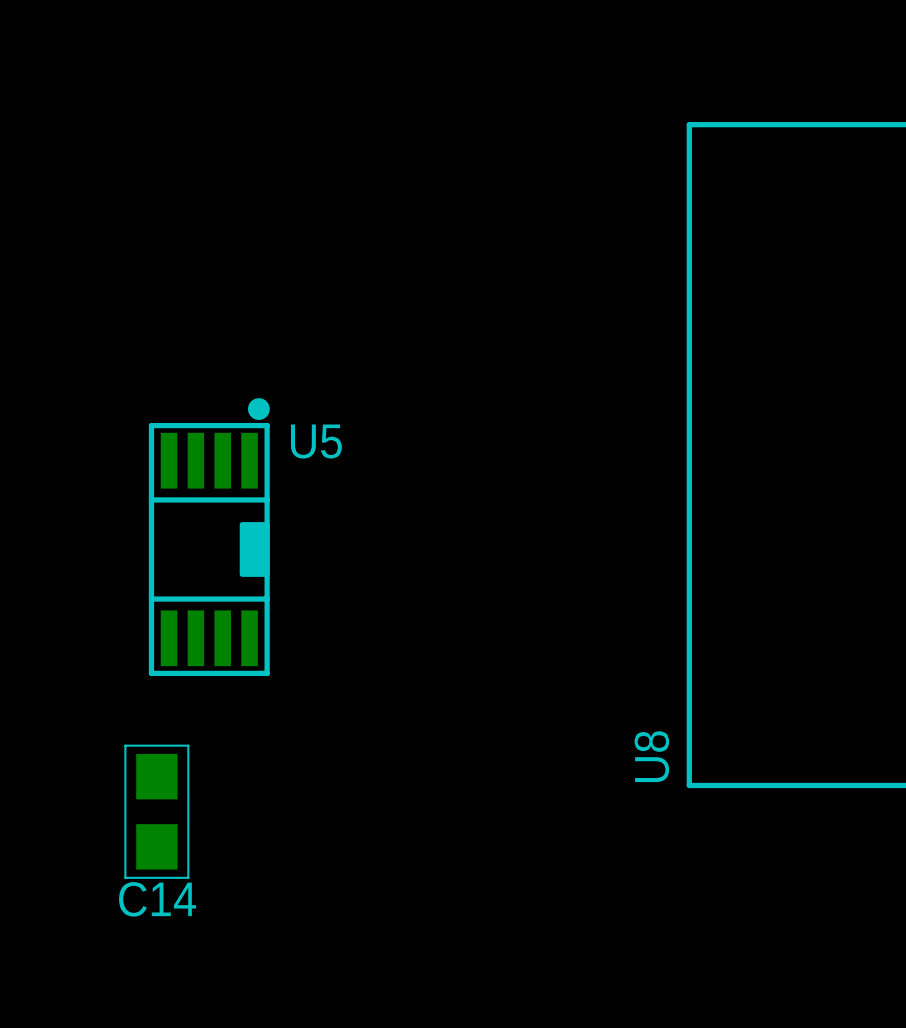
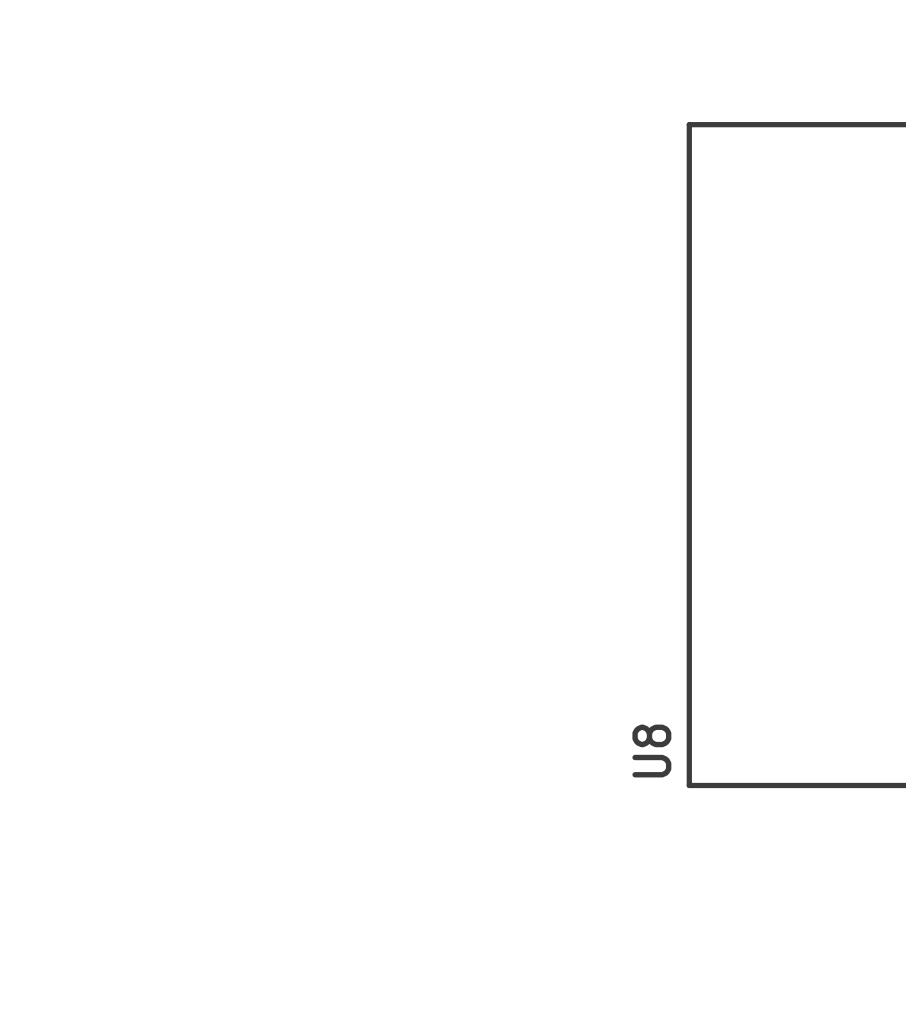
U5: (209, 537) -> none
C14: (156, 811) -> none

